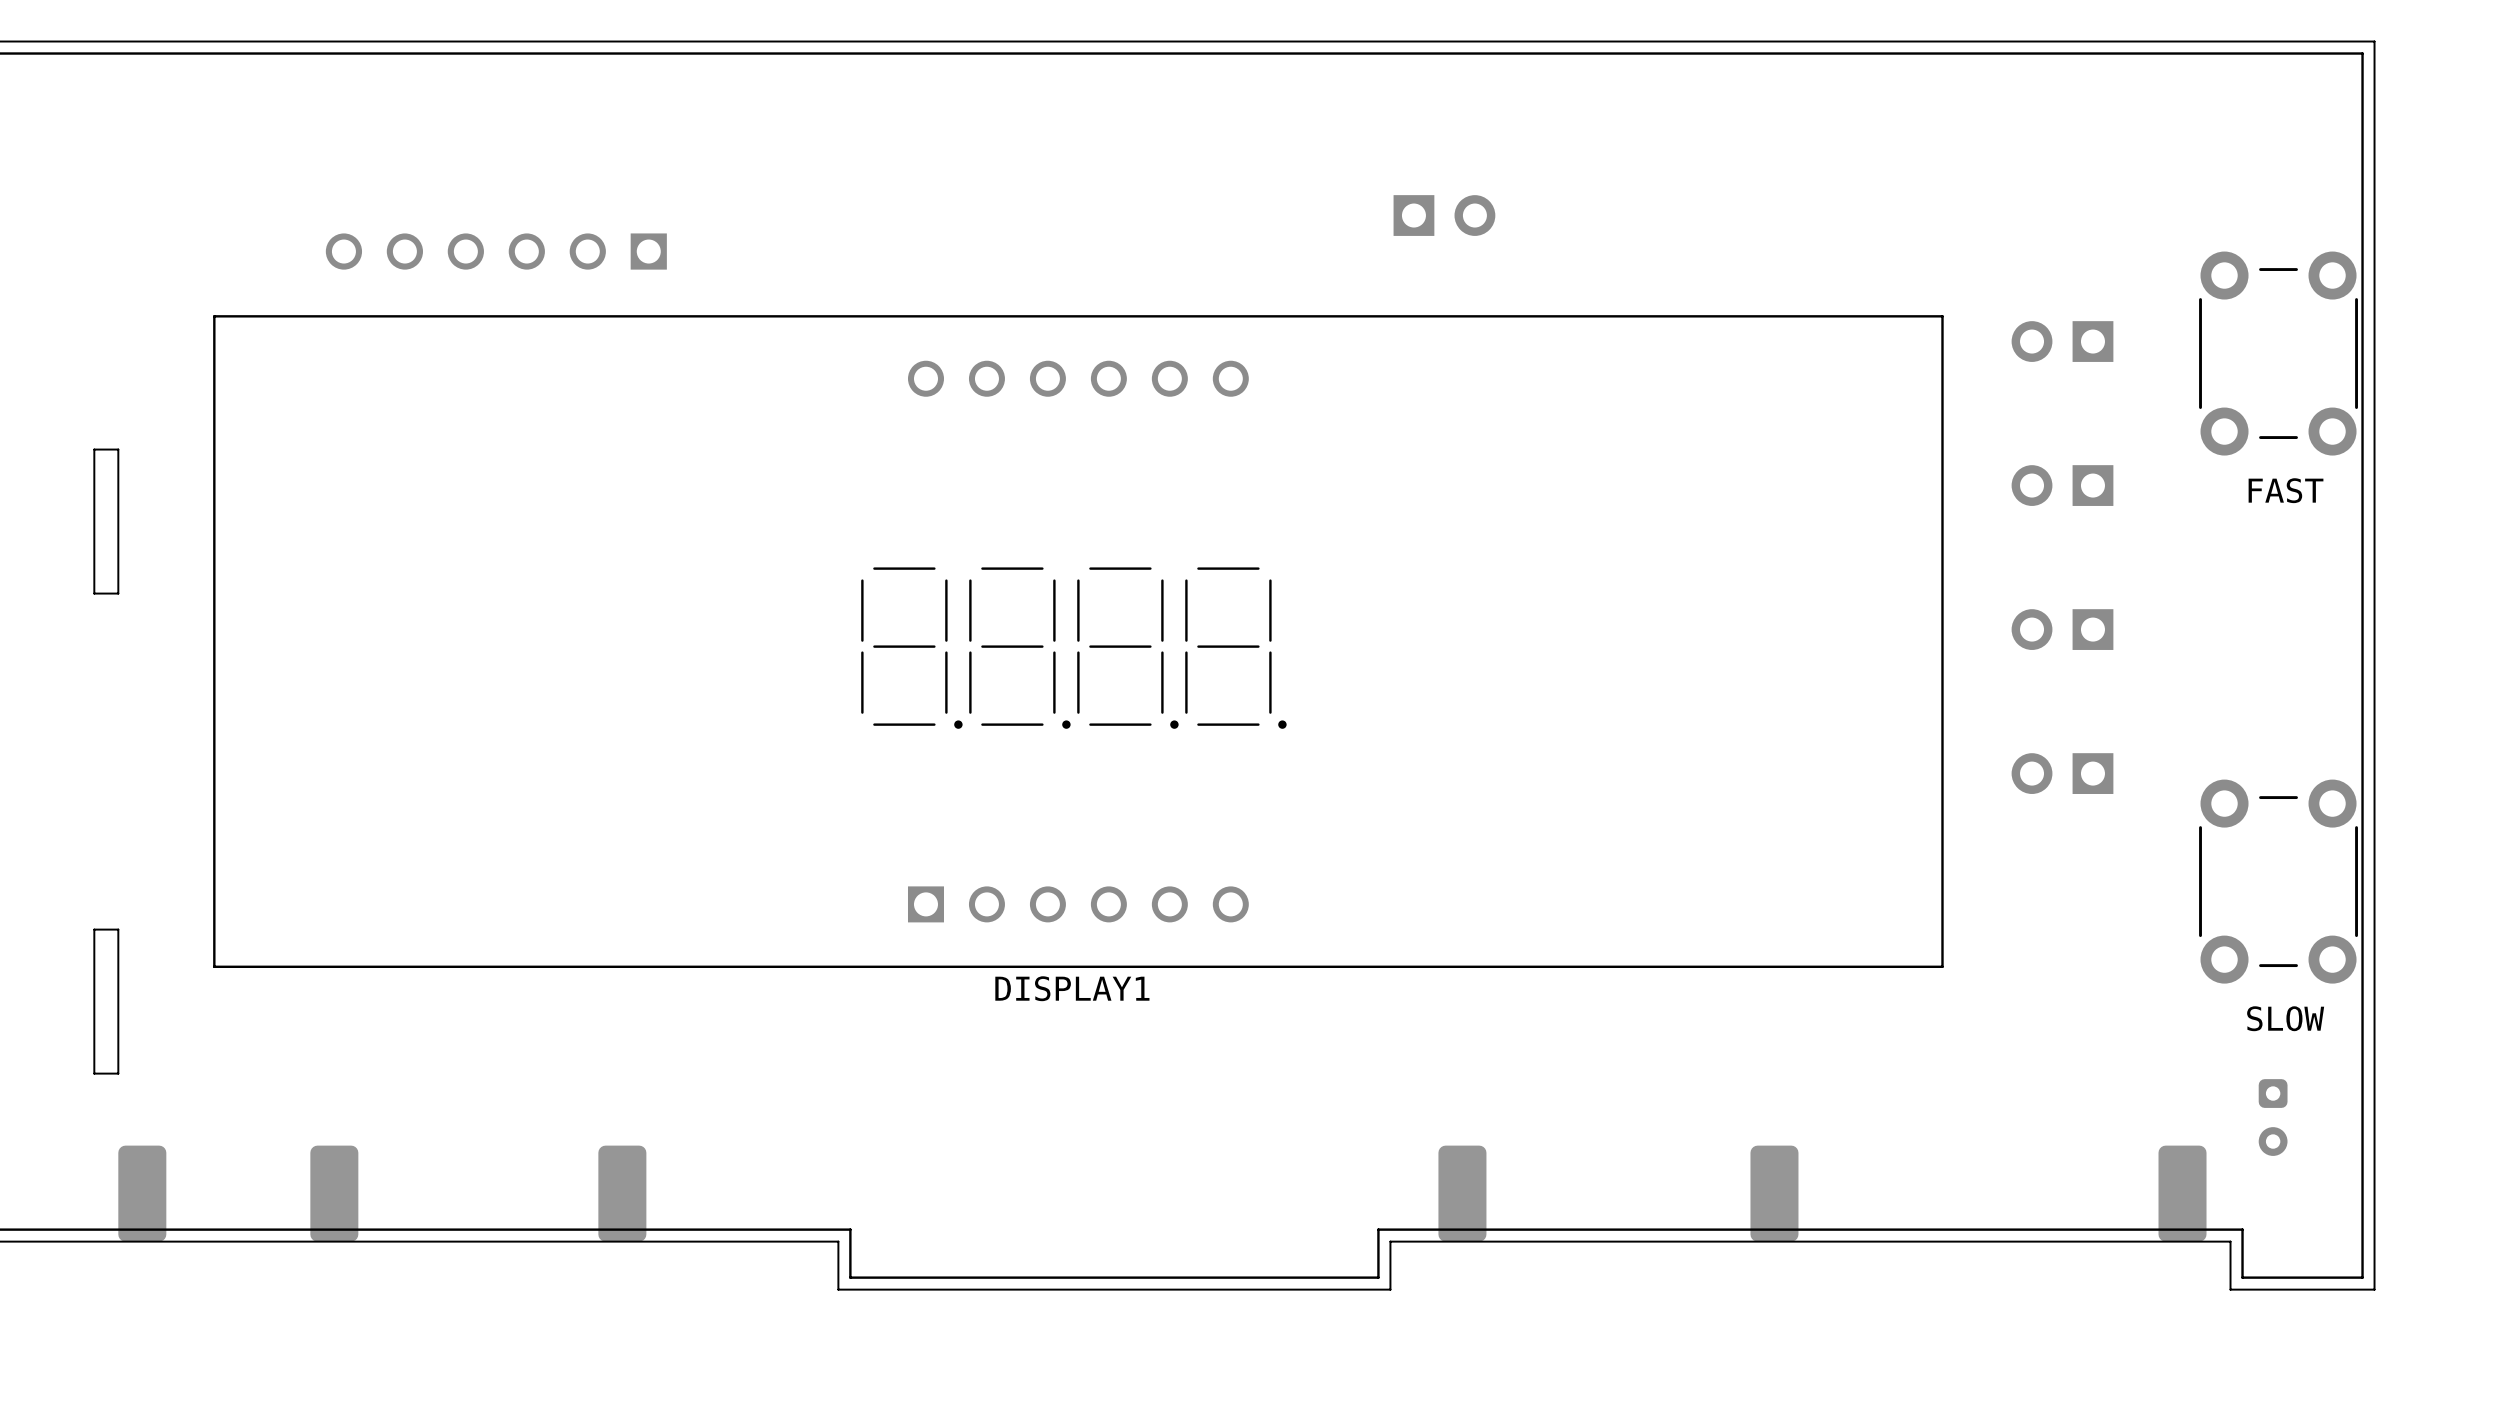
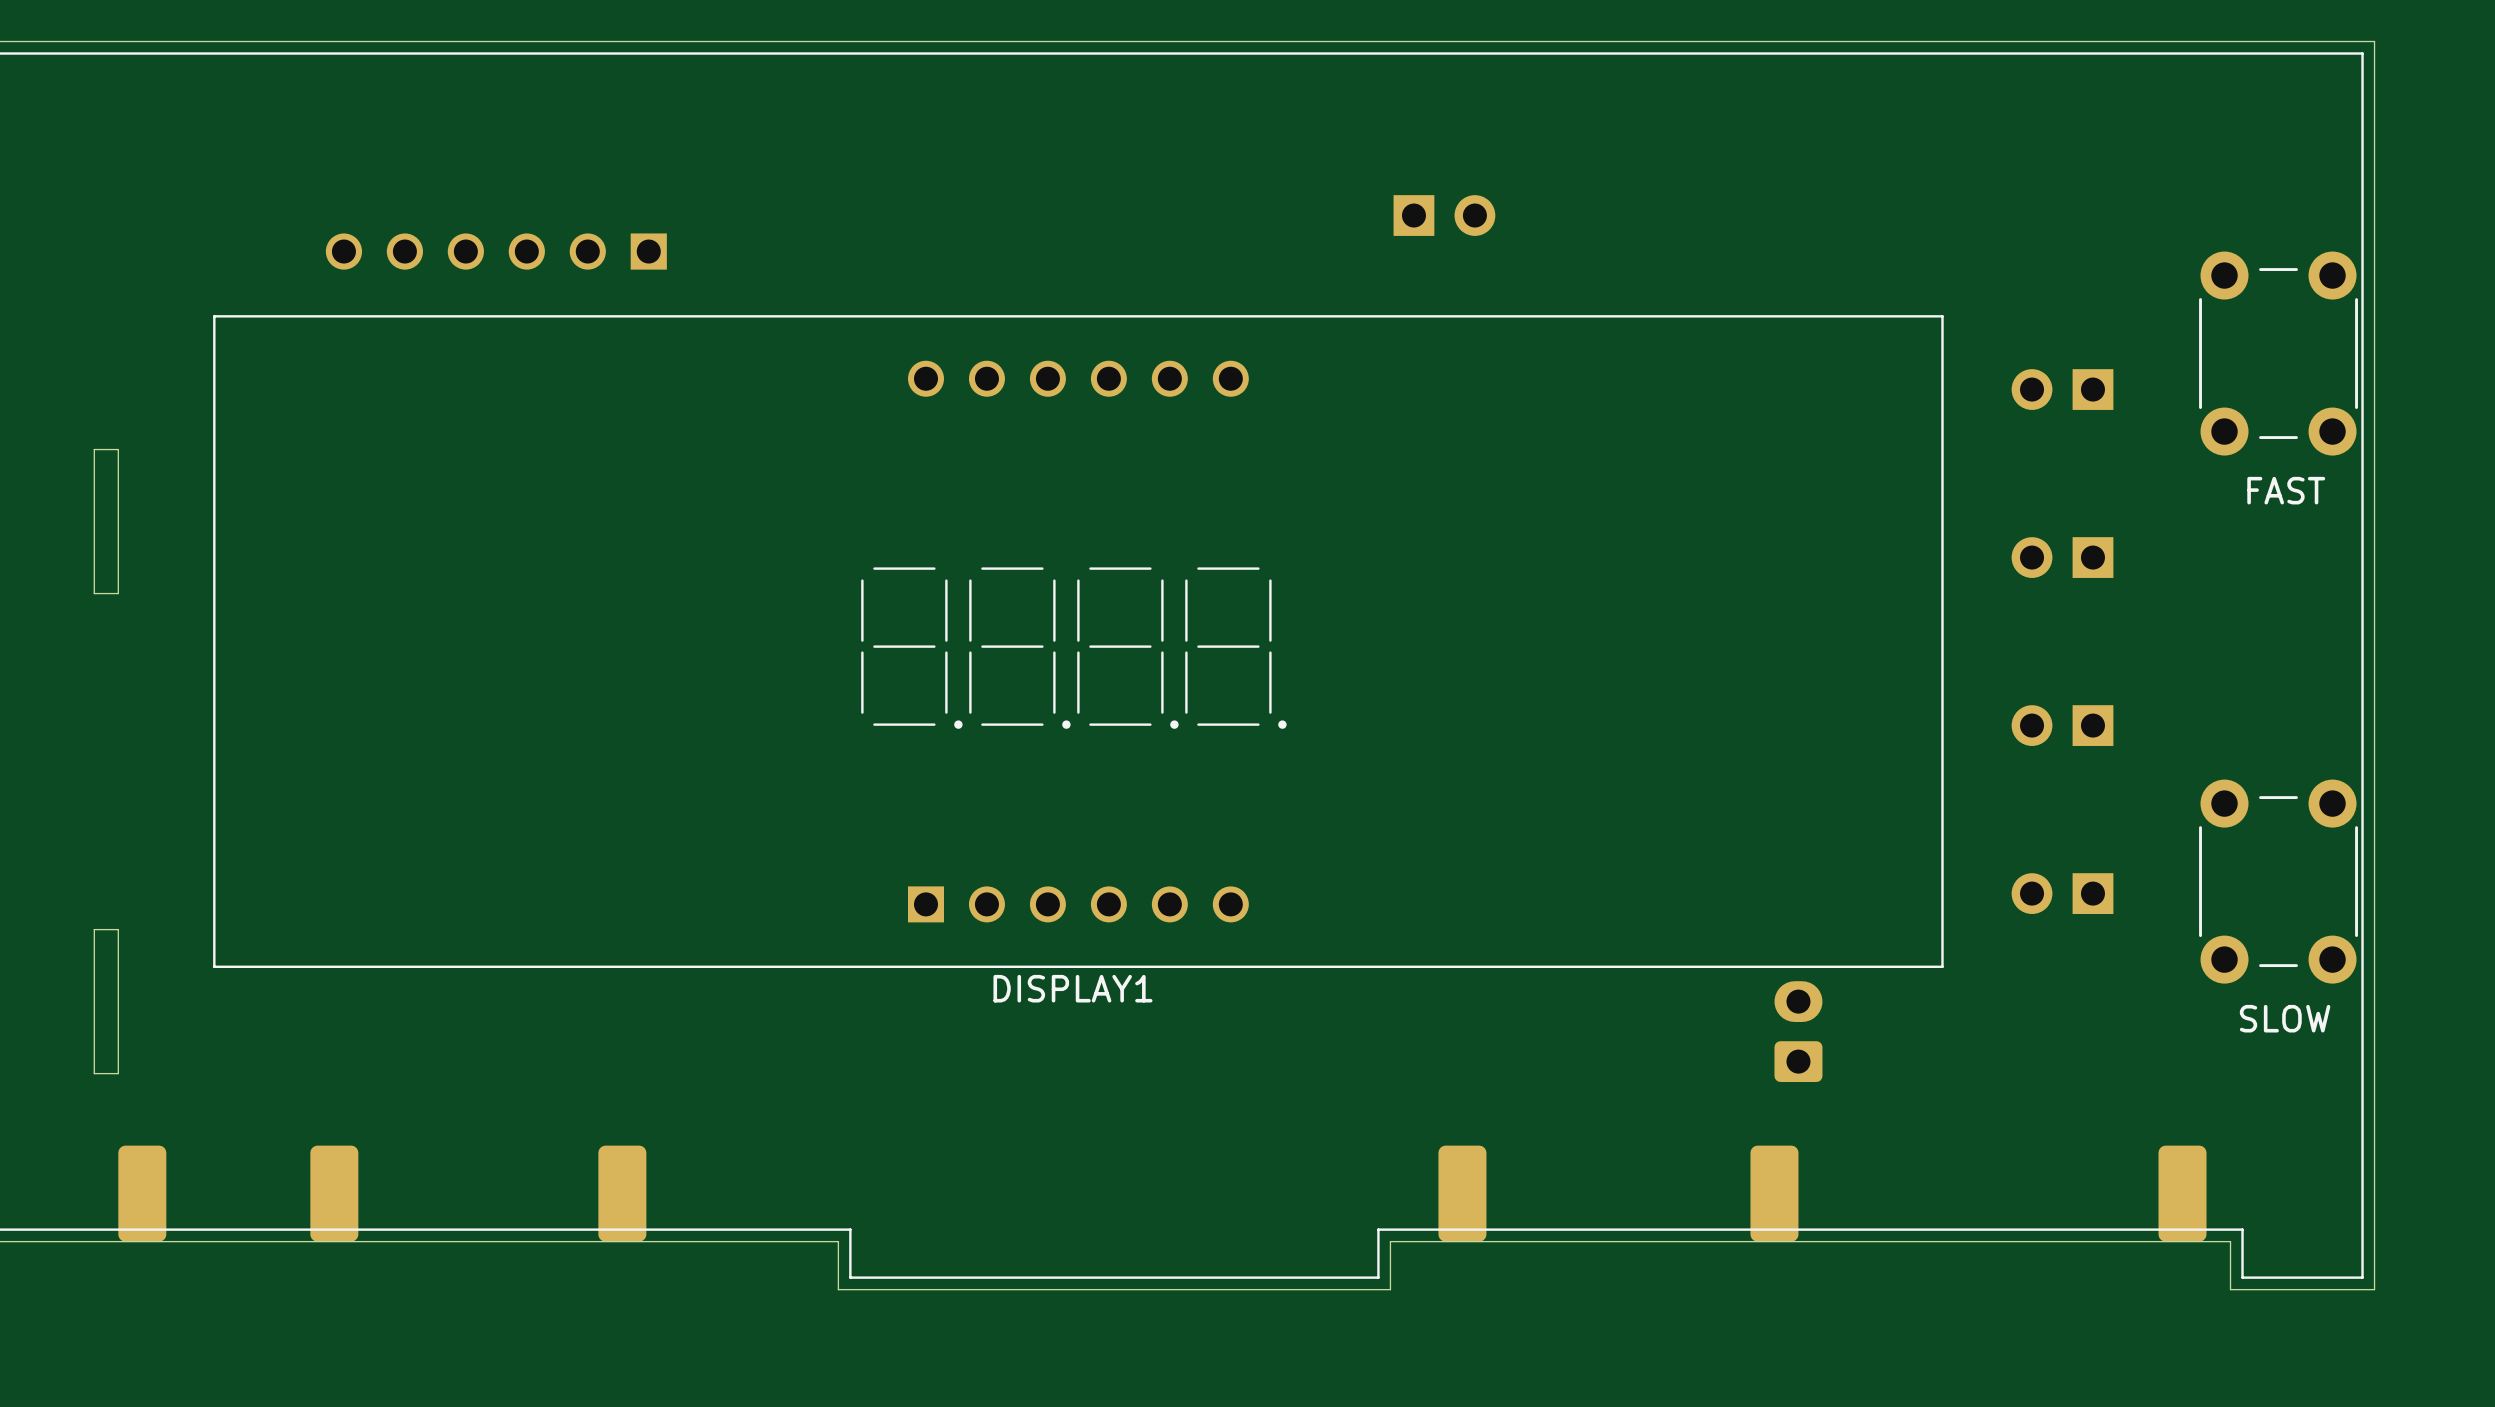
part: (2062, 341) -> none
part: none -> (2062, 389)
part: (2062, 485) -> none
part: none -> (2062, 557)
part: (2062, 629) -> none
part: none -> (2062, 725)
part: (2062, 773) -> none
part: none -> (2062, 893)
part: none -> (1798, 1031)
part: (2273, 1117) -> none

